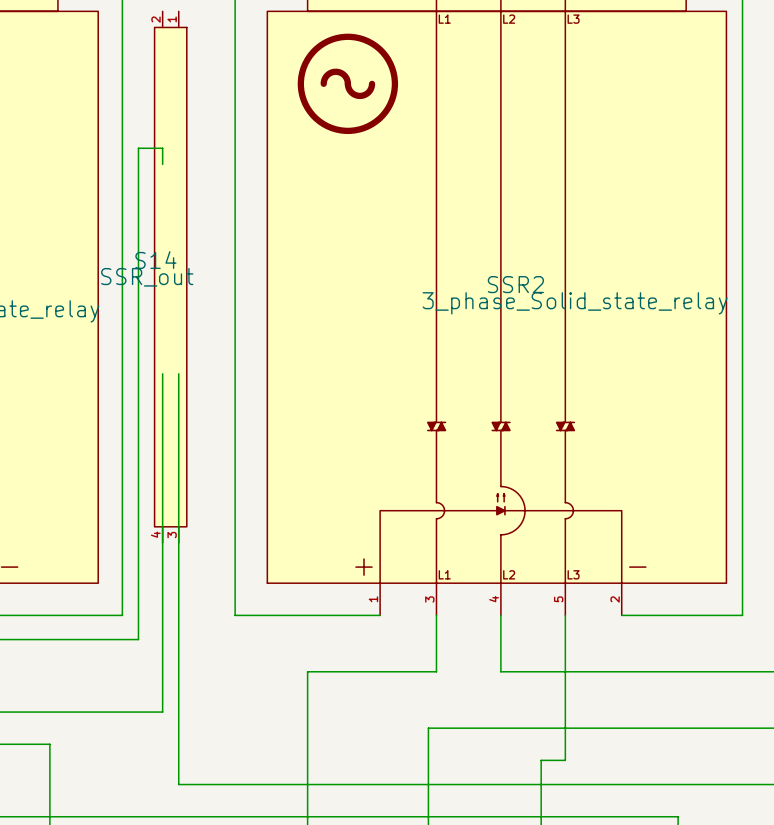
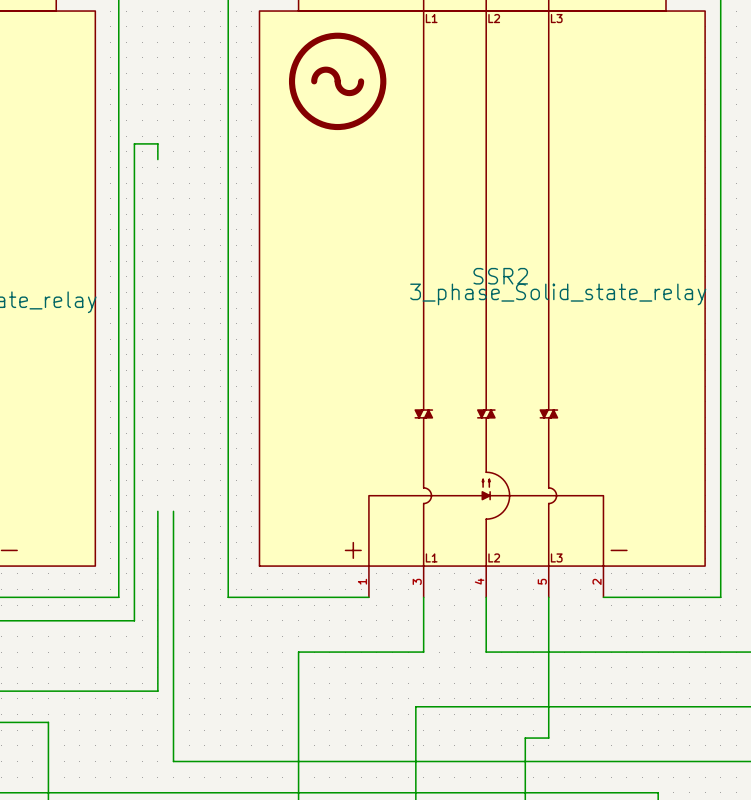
S14: SSR_out (170, 277) -> none
wire: (162, 373) (162, 526) -> none
wire: (178, 373) (178, 526) -> none

